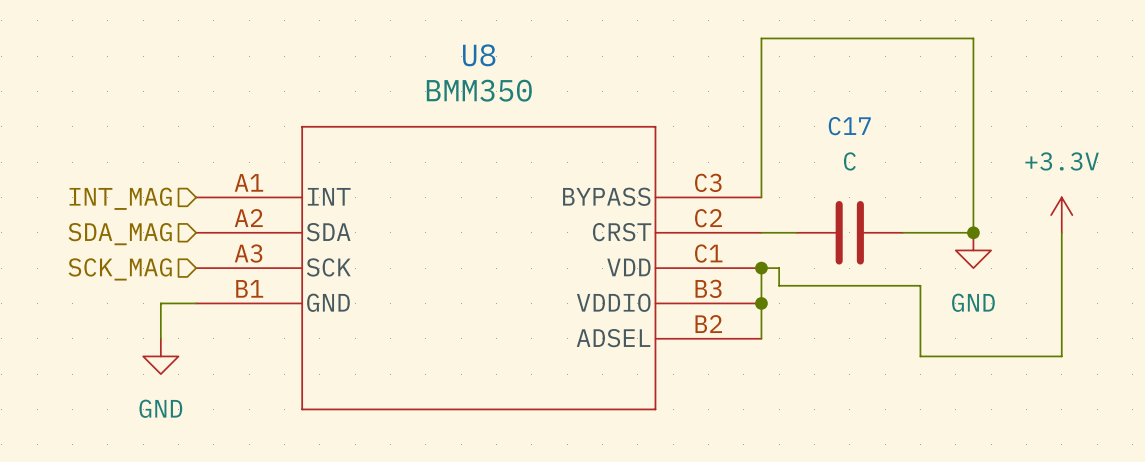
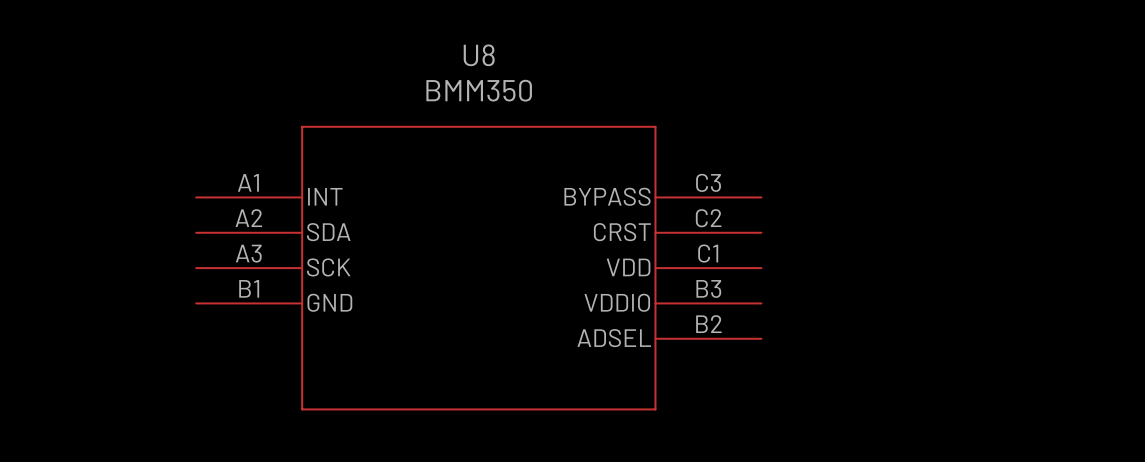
wire: (761, 197) (761, 38) (973, 38) (973, 232) (902, 232) -> none
hierarchical label: INT_MAG (120, 198) -> none
power symbol: +3.3V (1061, 215) -> none
wire: (761, 232) (796, 232) -> none
C17: C (849, 232) -> none
junction: (973, 232) -> none
wire: (1061, 232) (1061, 356) (920, 356) (920, 285) (779, 285) (779, 268) (761, 268) (761, 338) -> none
hierarchical label: SDA_MAG (120, 234) -> none
power symbol: GND (973, 250) -> none
junction: (761, 268) -> none
hierarchical label: SCK_MAG (120, 269) -> none
wire: (196, 303) (160, 303) (160, 338) -> none
junction: (761, 303) -> none
power symbol: GND (160, 356) -> none

